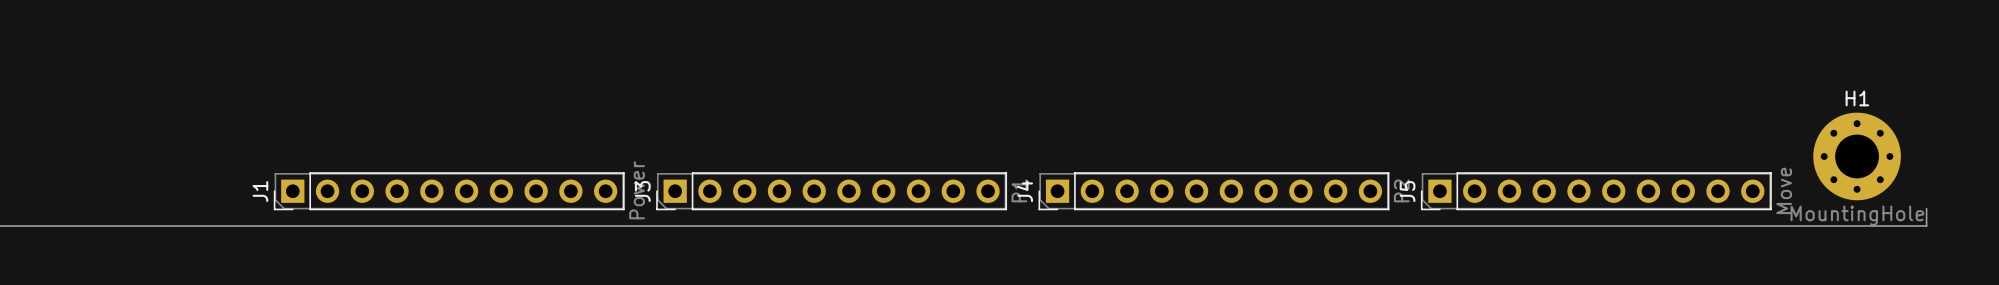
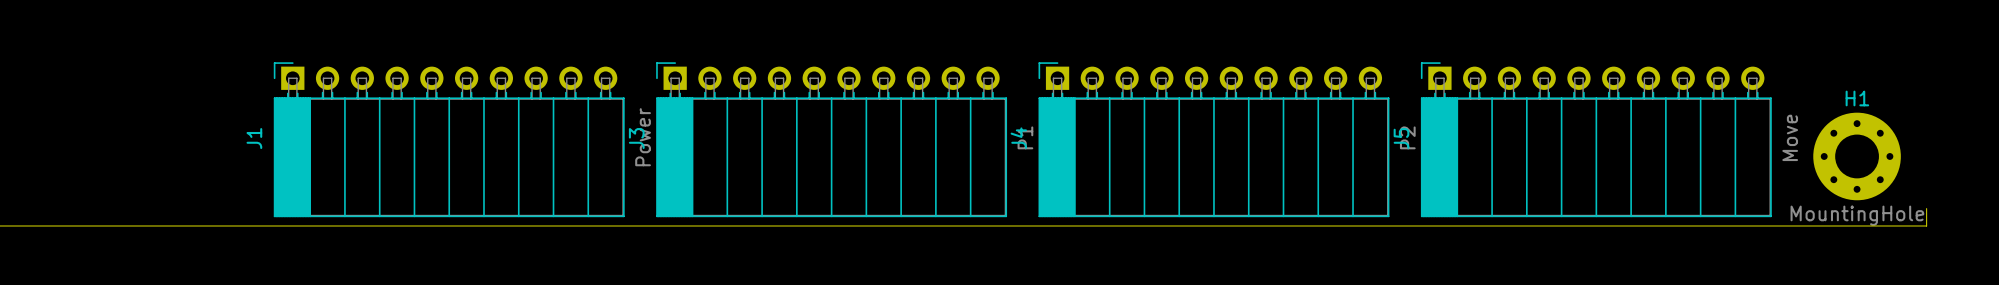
J1 footprint: [273, 172, 625, 211] -> [273, 62, 625, 218]
J3 footprint: [656, 172, 1008, 211] -> [656, 62, 1008, 218]
J4 footprint: [1038, 172, 1390, 211] -> [1038, 62, 1390, 218]
J5 footprint: [1420, 172, 1772, 211] -> [1420, 62, 1772, 218]

